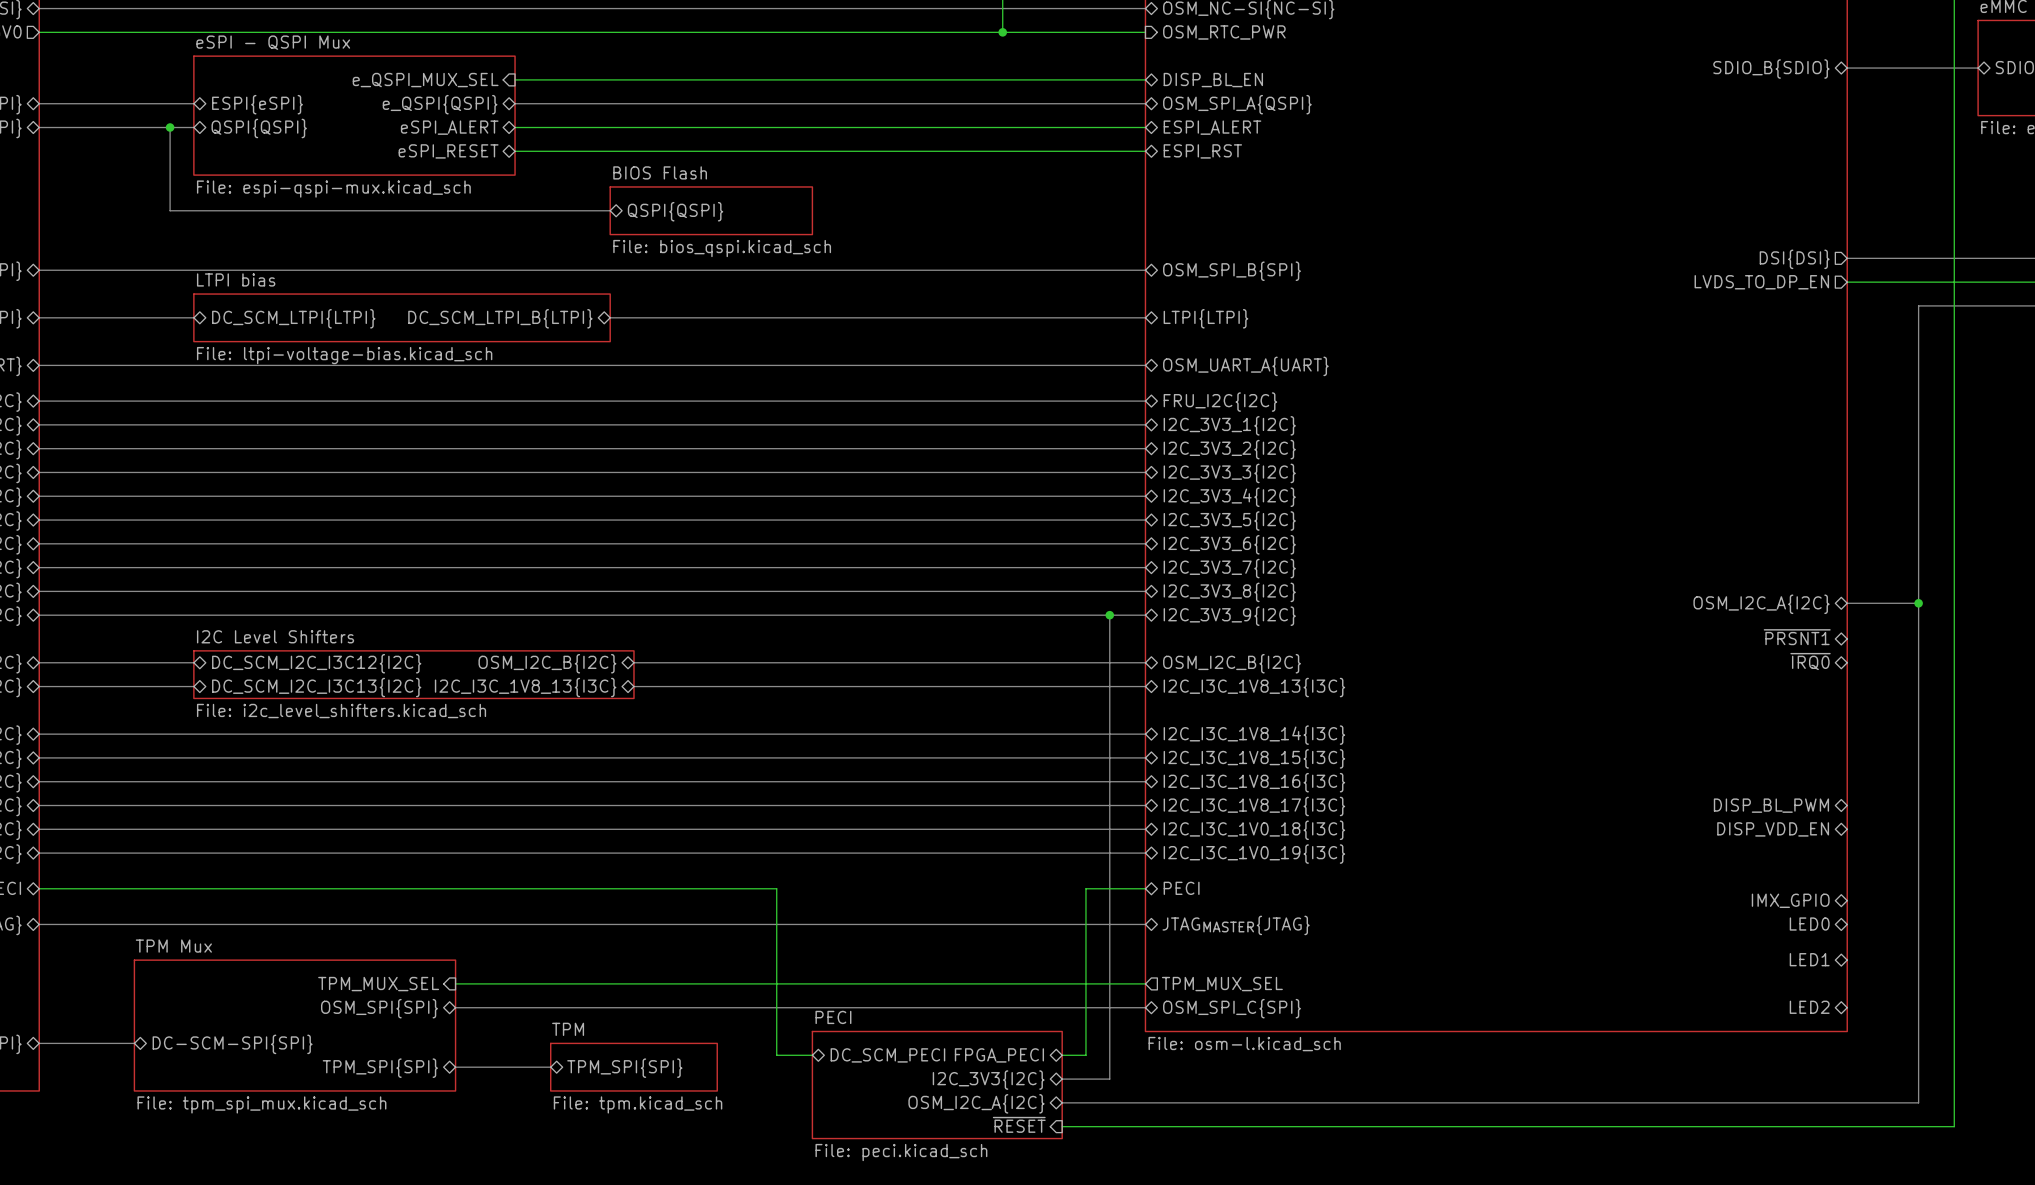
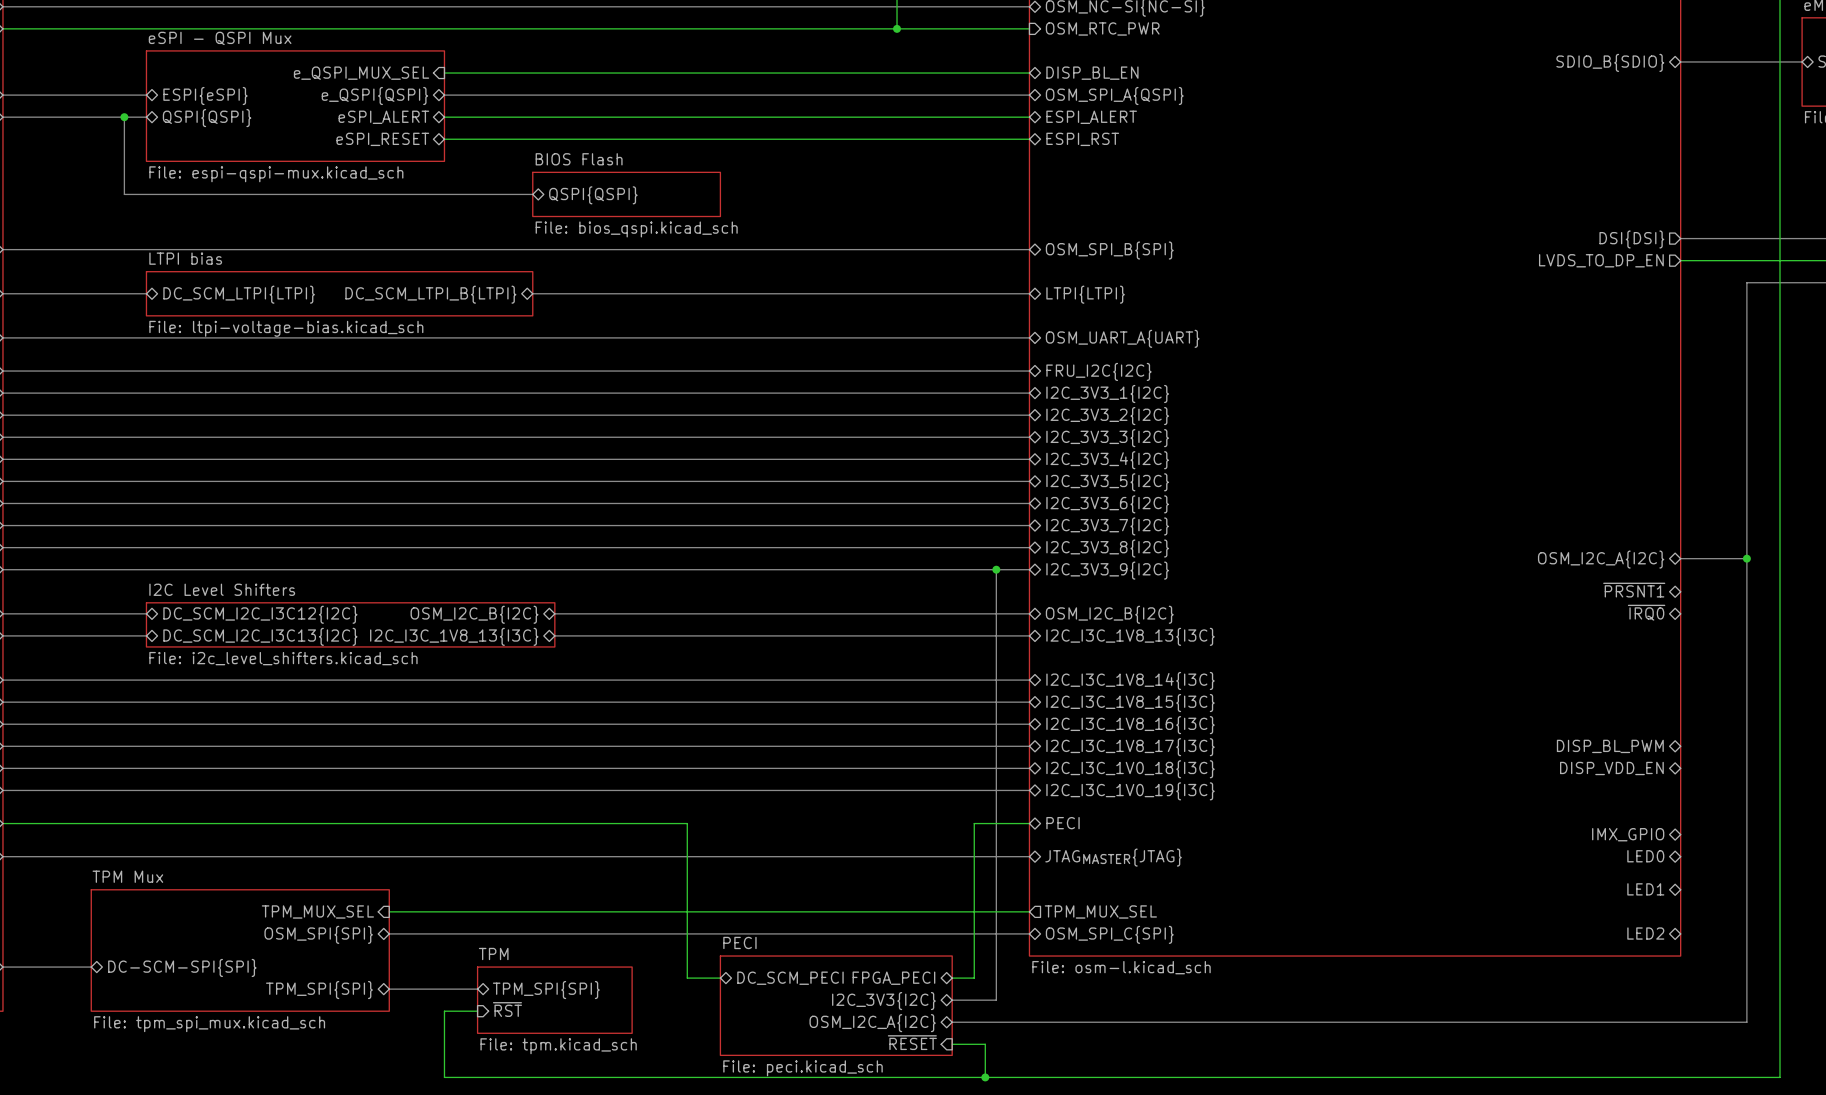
sheet TPM: File: tpm.kicad_sch (633, 1067) -> none
sheet TPM: none -> File: tpm.kicad_sch (554, 1000)
sheet pin: none -> ~{RST} (507, 1009)
wire: (1097, 1126) (1954, 1126) -> (477, 1011) (444, 1011) (444, 1077) (1780, 1077) (1780, 1044)
wire: none -> (985, 1044) (985, 1077)
junction: none -> (985, 1077)

